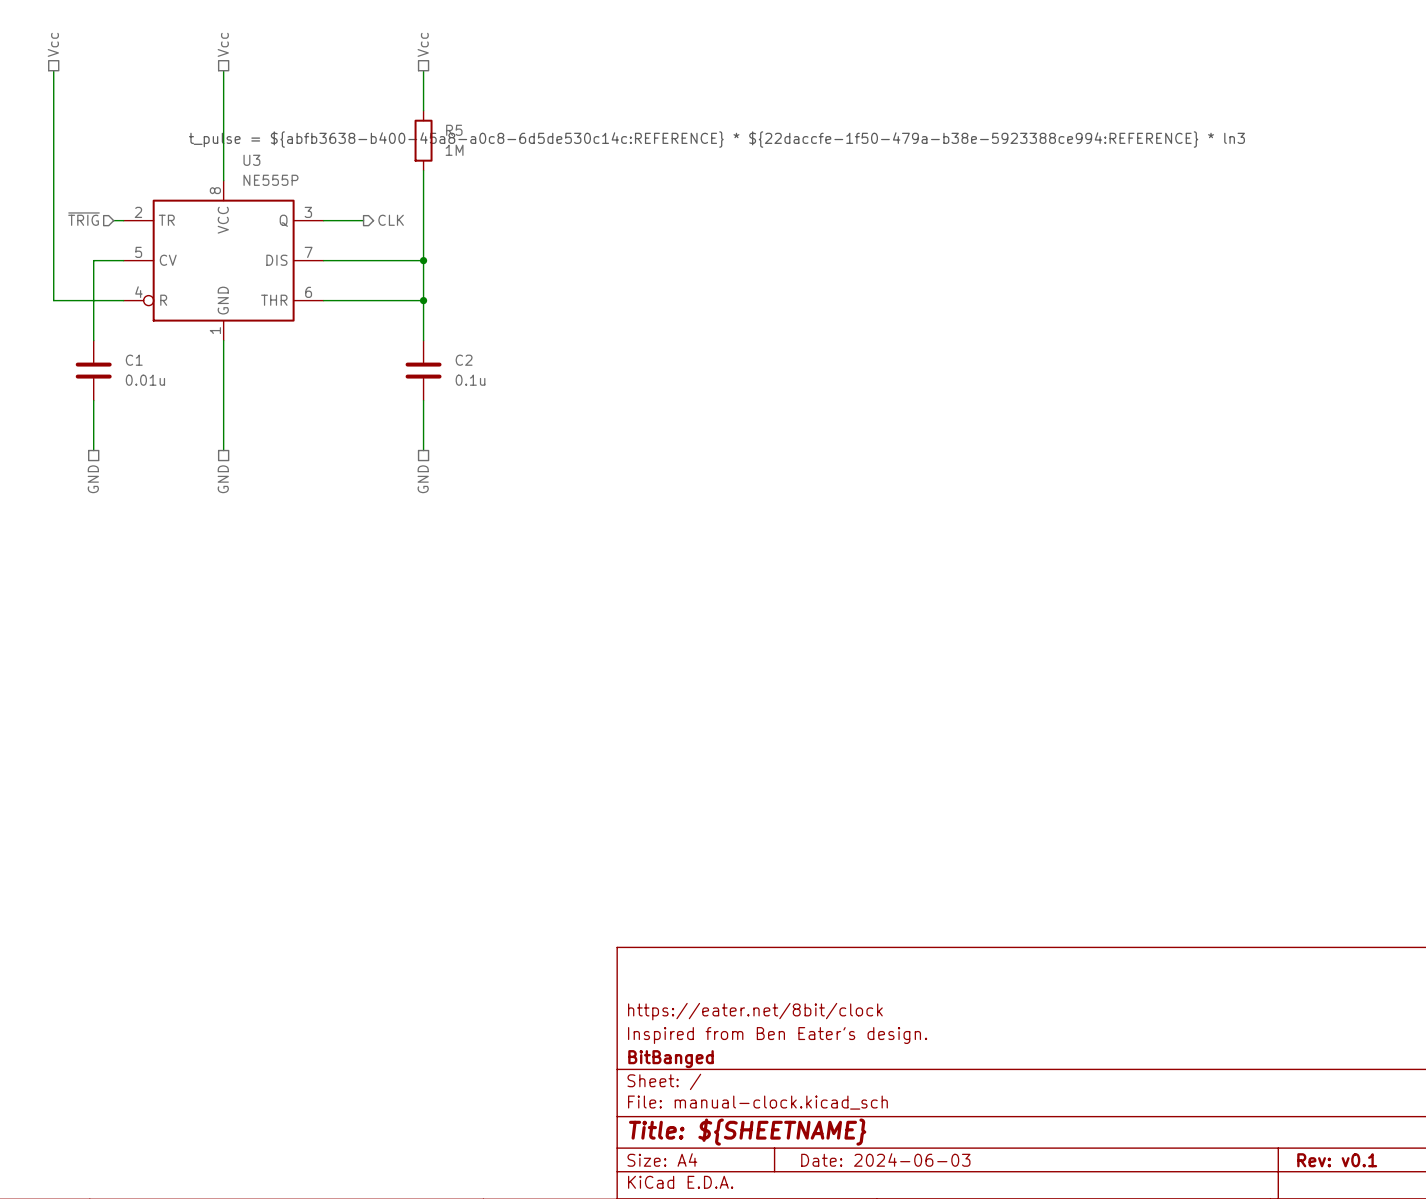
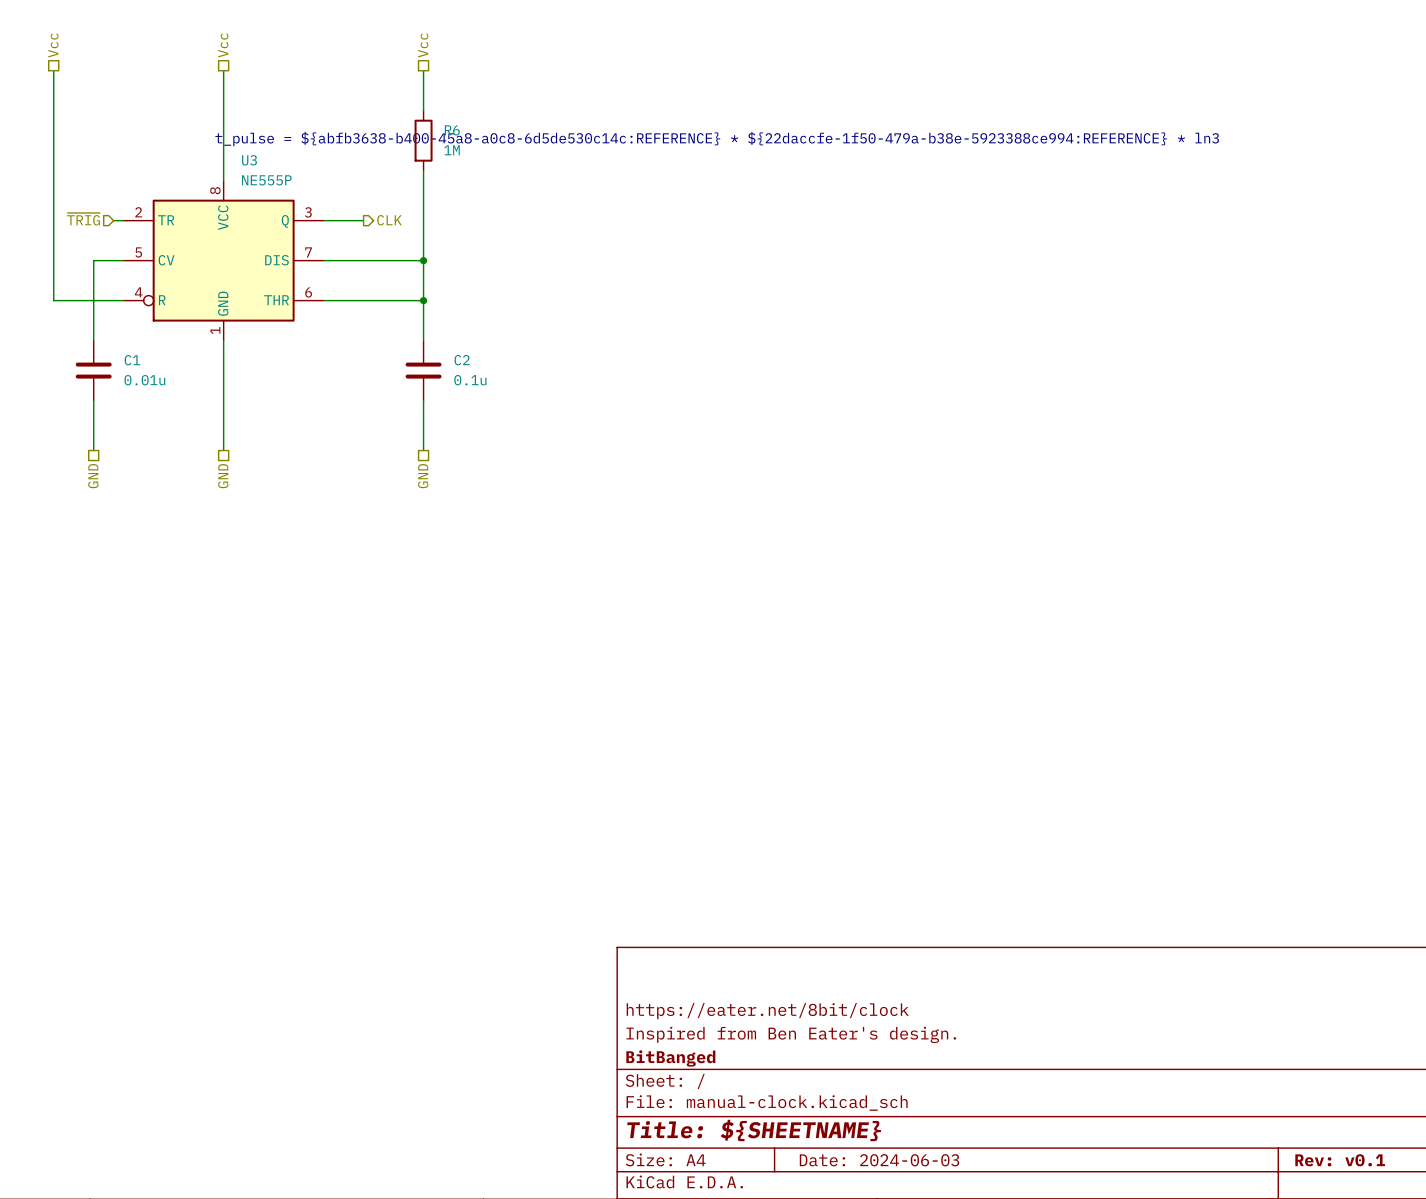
R5 name: R5 (454, 130) -> R6 (452, 130)

